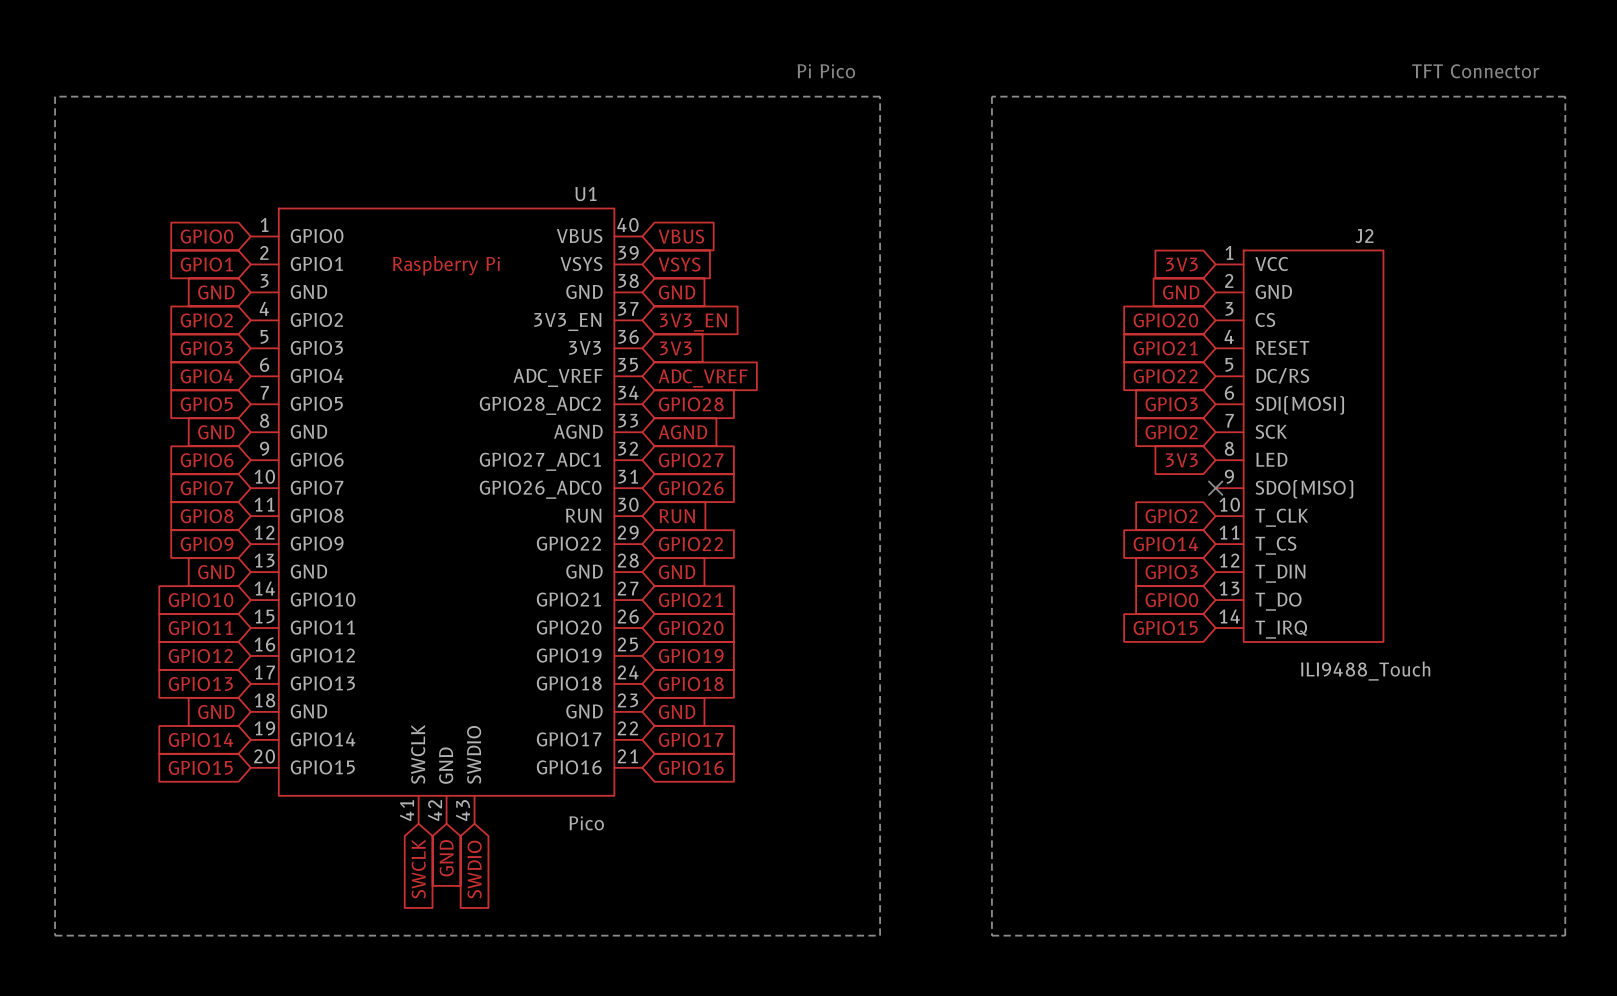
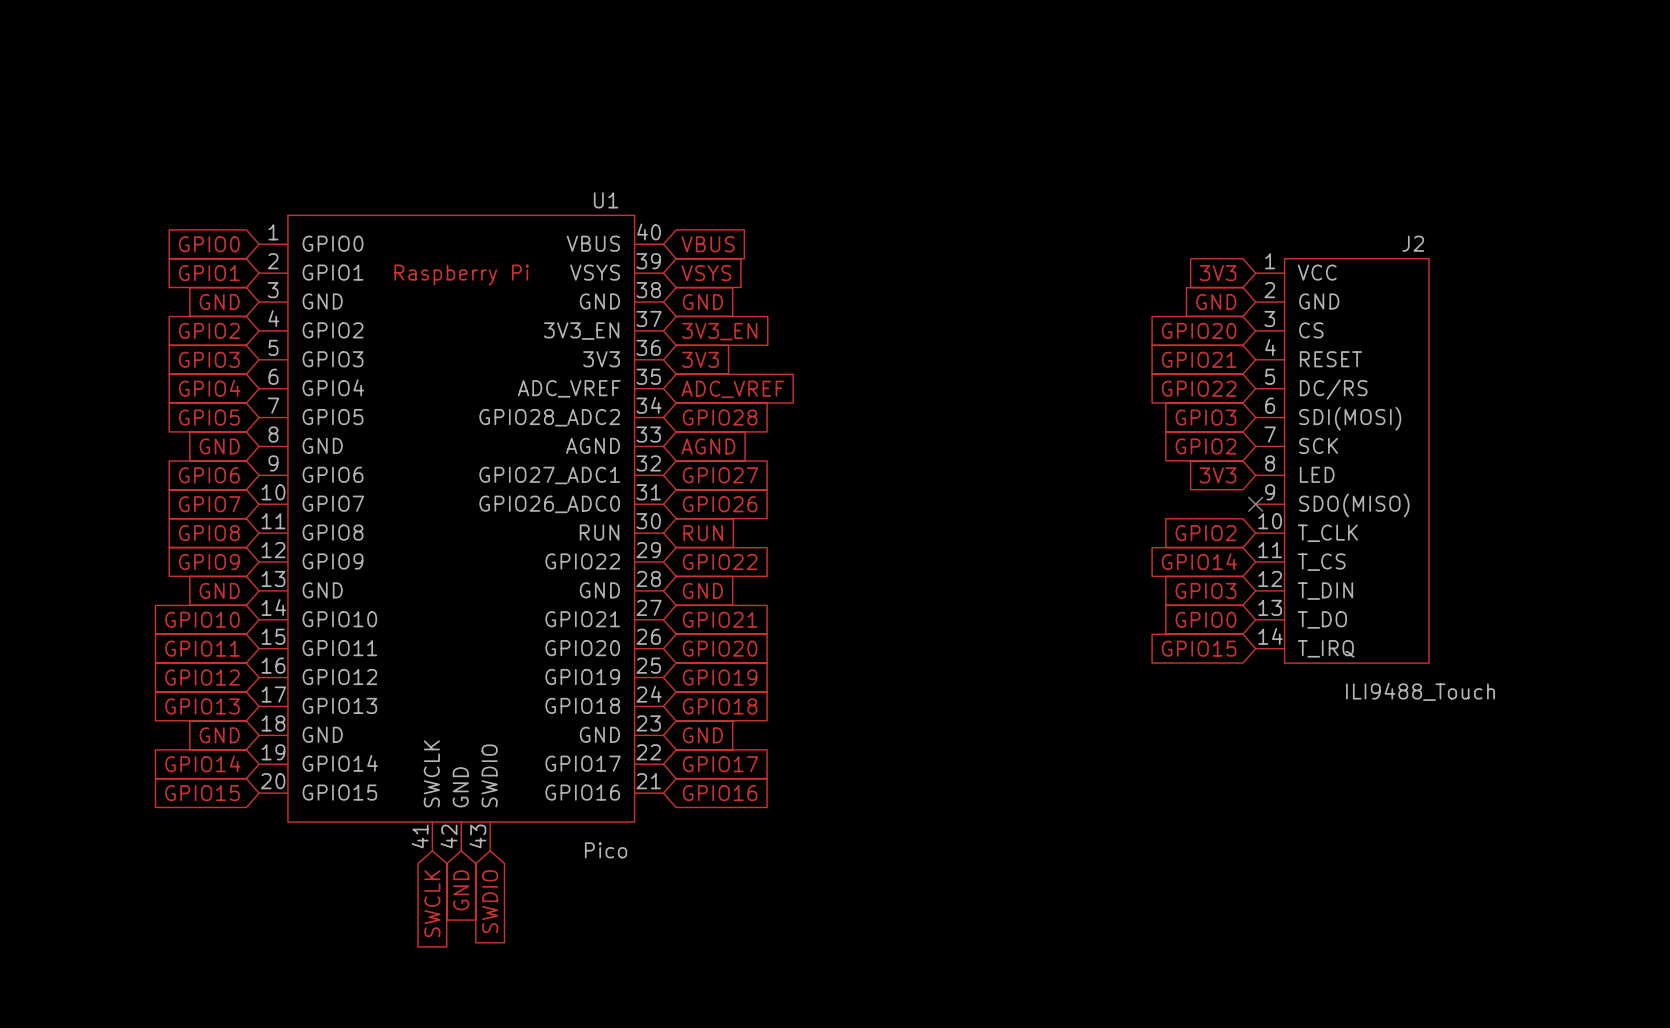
text: Pi Pico (826, 71) -> none
text: TFT Connector (1475, 71) -> none
line: (55, 96) (55, 935) (880, 935) (880, 96) (55, 96) -> none
line: (991, 96) (1565, 96) (1565, 935) (991, 935) (991, 96) -> none

